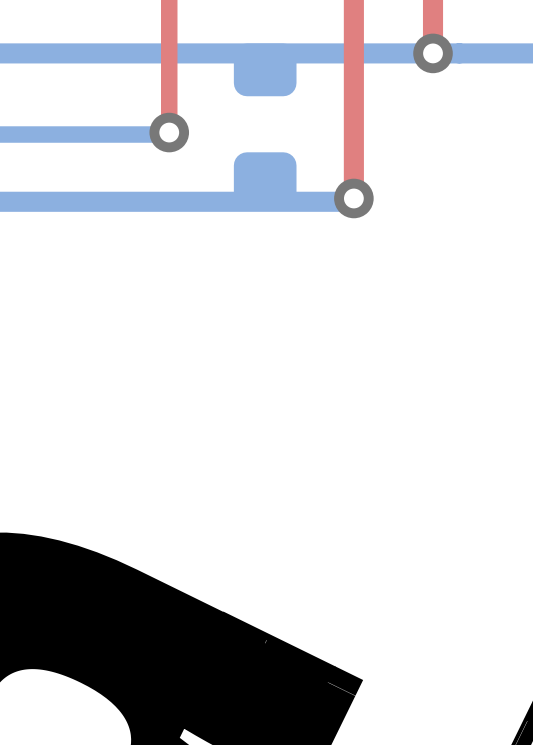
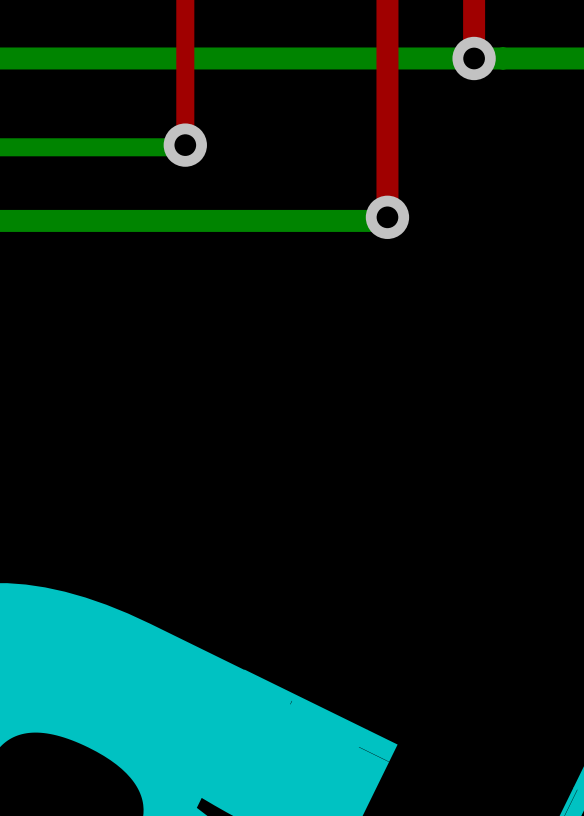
part: (265, 124) -> none

